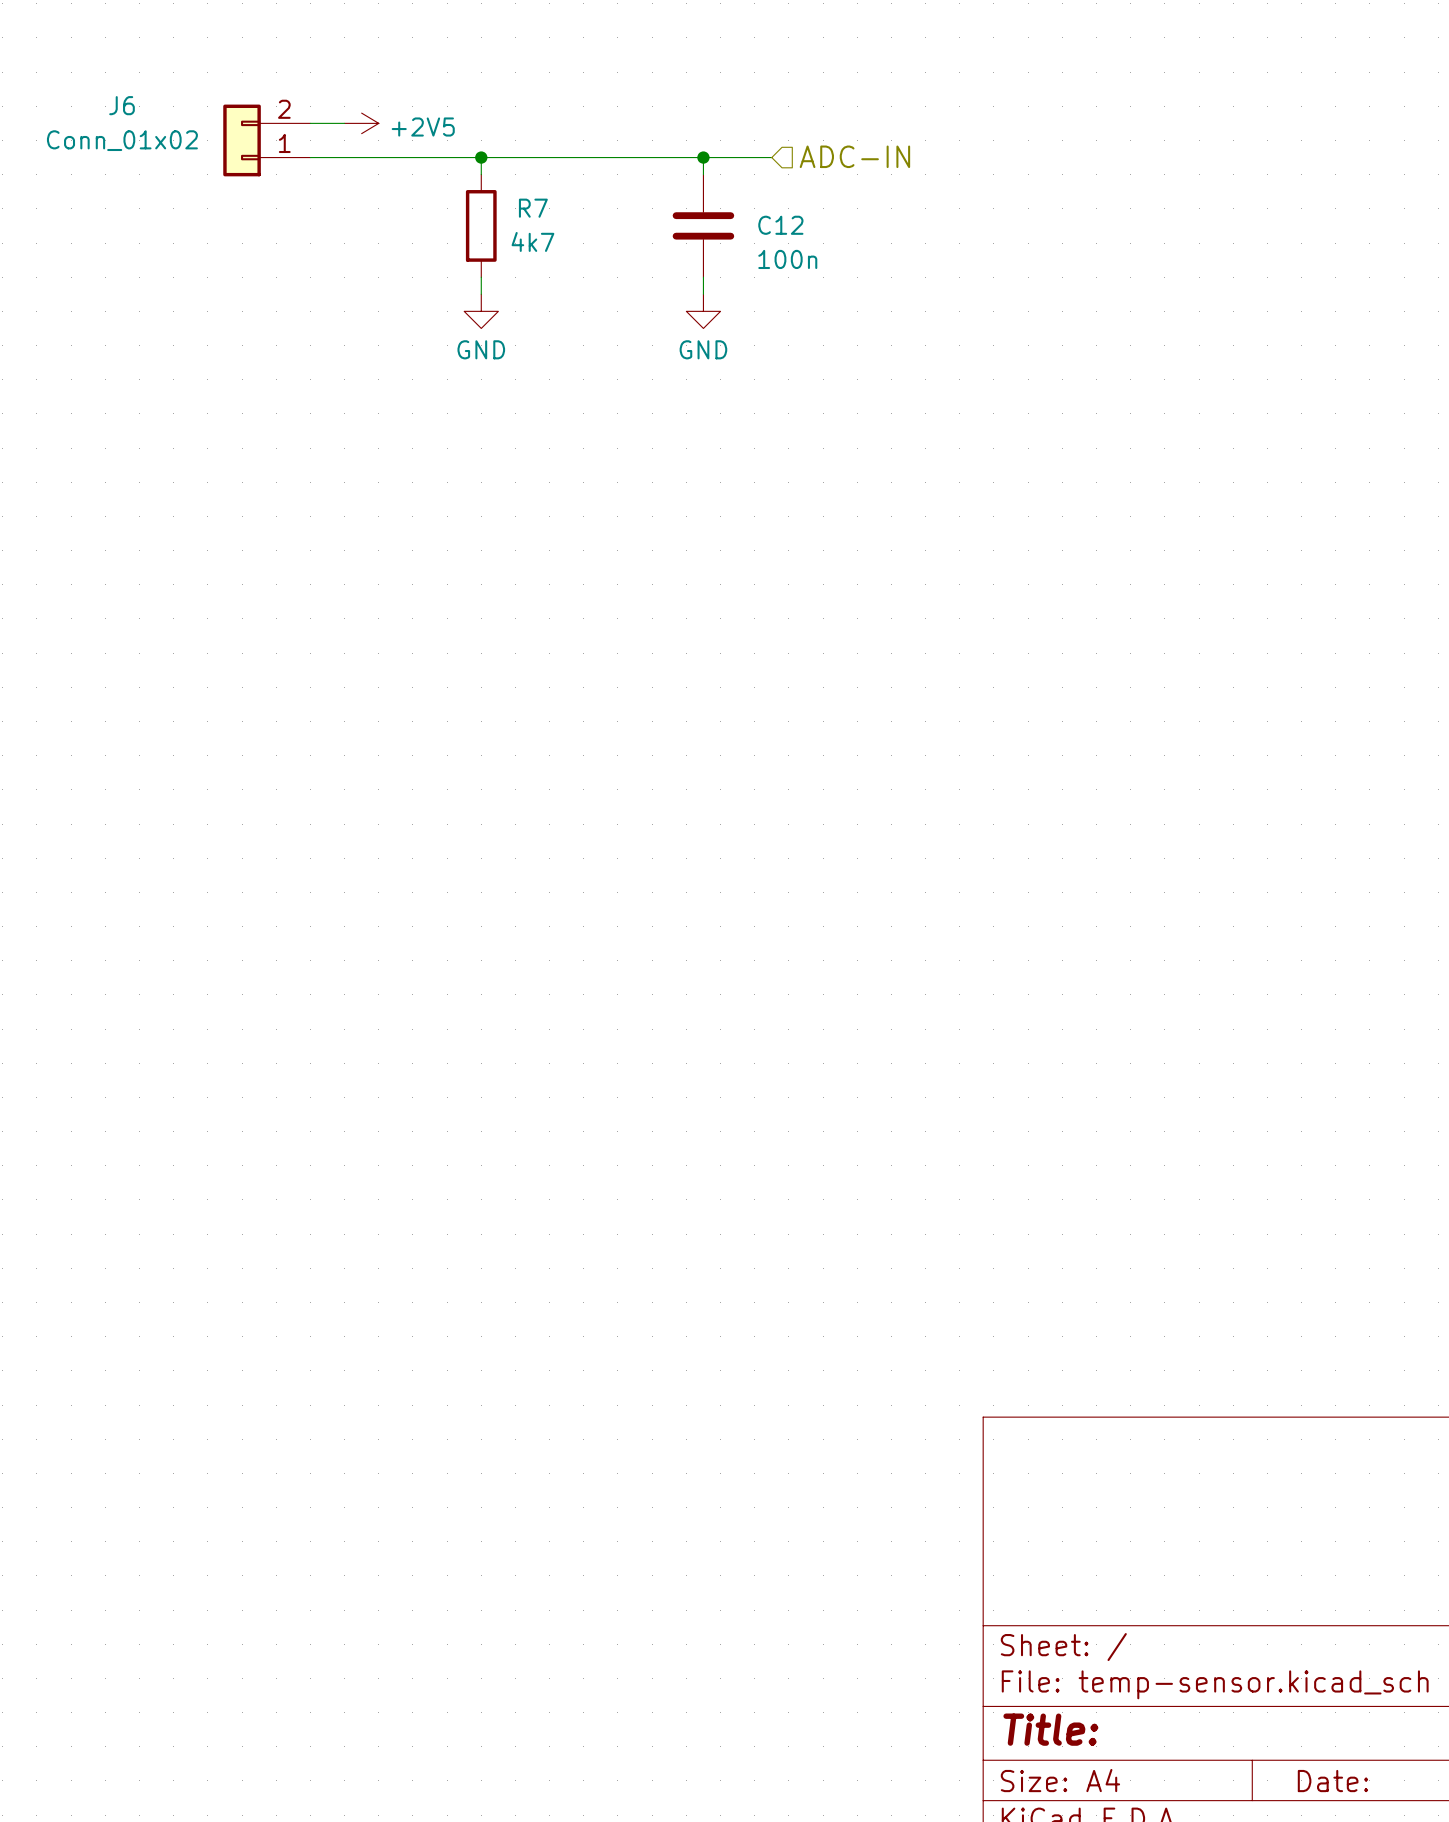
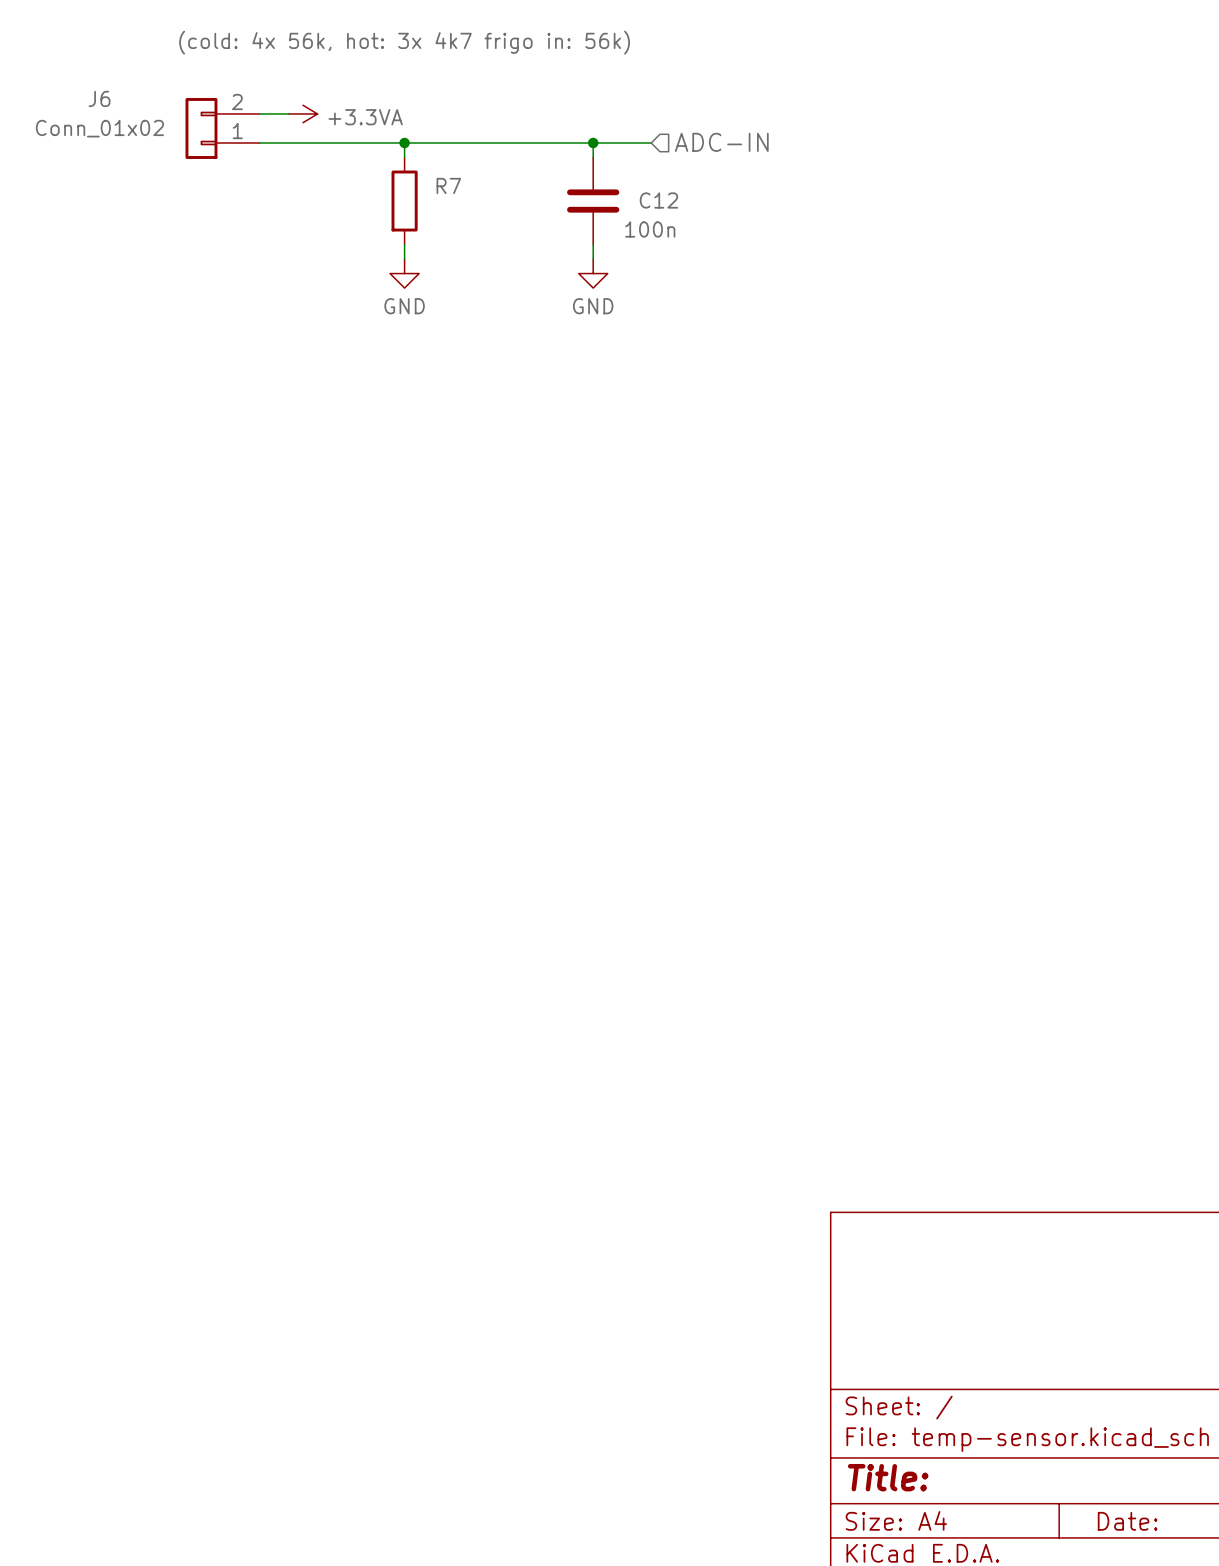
power symbol: +2V5 (361, 123) -> +3.3VA (303, 113)
R7 value: 4k7 (532, 241) -> (cold: 4x 56k, hot: 3x 4k7 frigo in: 56k) (404, 42)
C12 value position: 100n (787, 259) -> 100n (650, 229)

